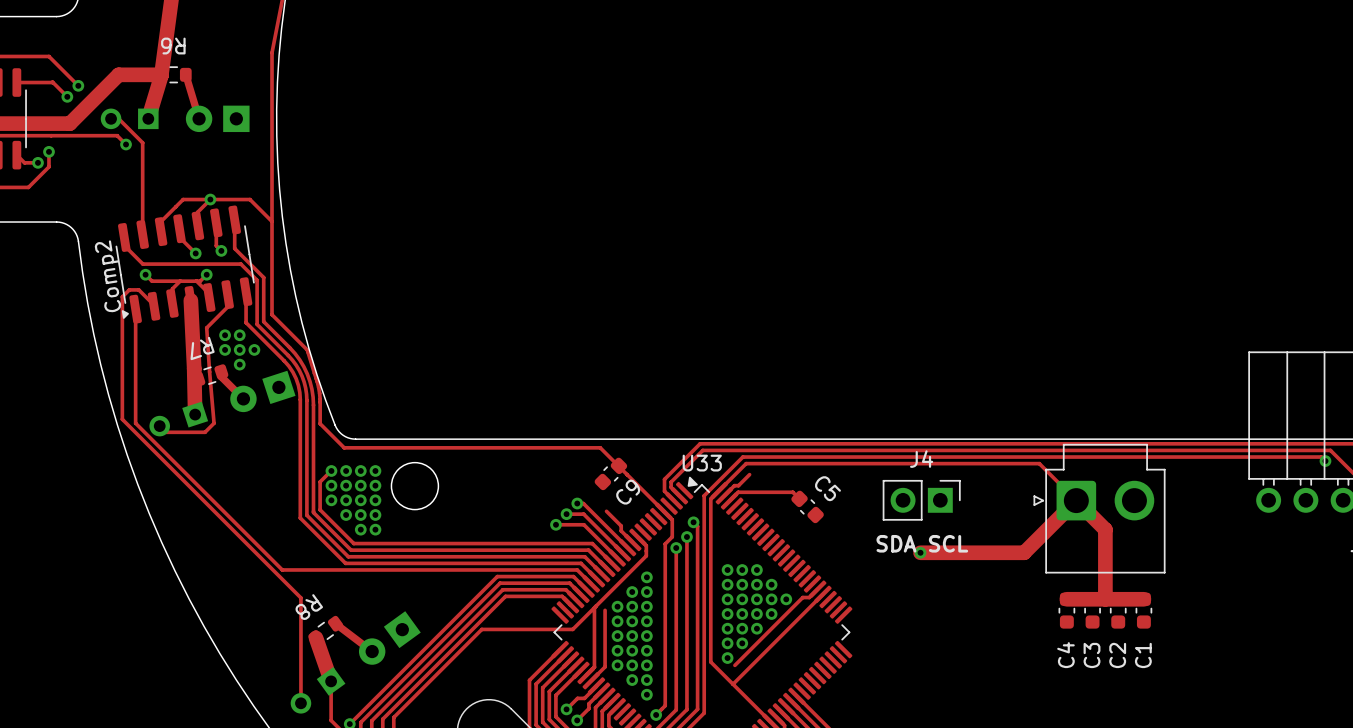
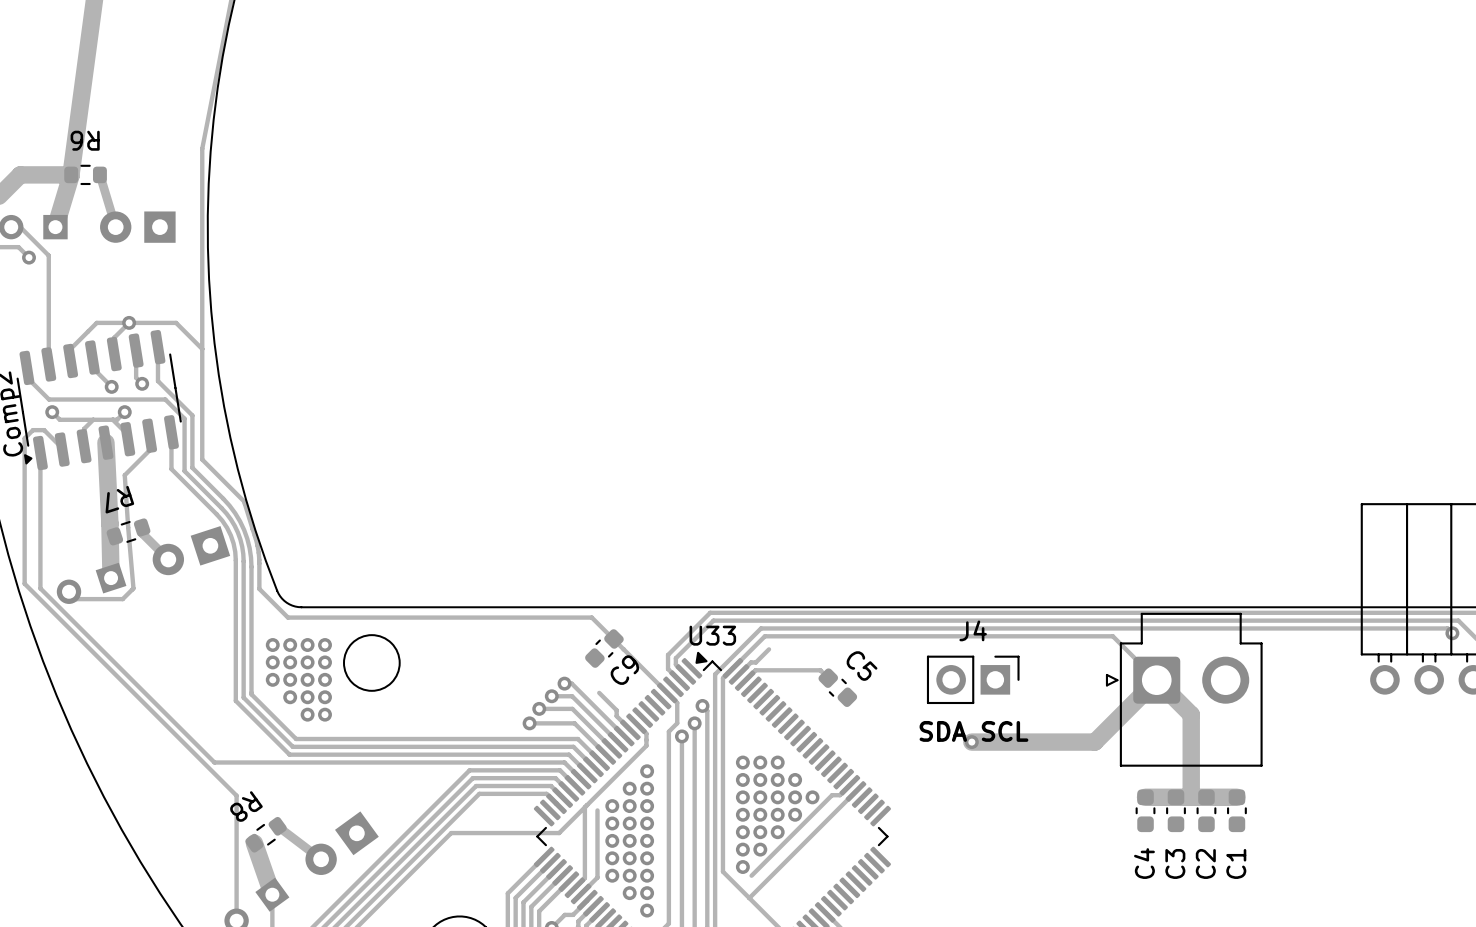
via: (225, 335) -> none
via: (239, 335) -> none
via: (225, 349) -> none
via: (239, 349) -> none
via: (254, 349) -> none
via: (239, 364) -> none
track: (331, 470) (320, 481) (320, 509) (353, 543) (592, 543) -> (529, 723) (574, 723) (582, 731)
via: none -> (529, 723)

